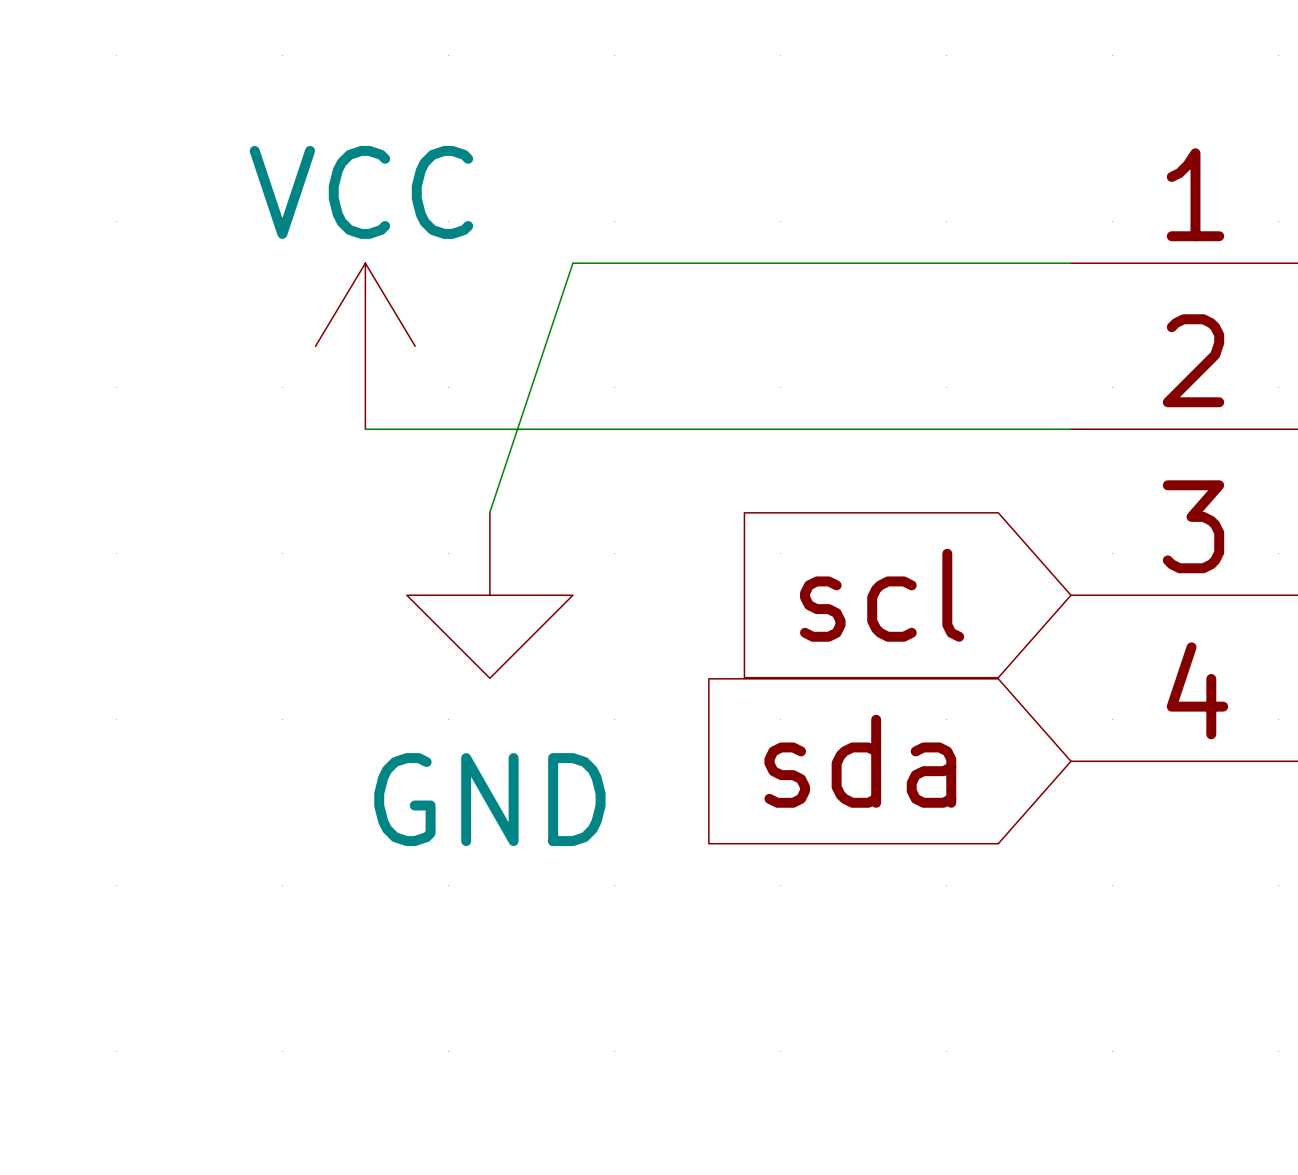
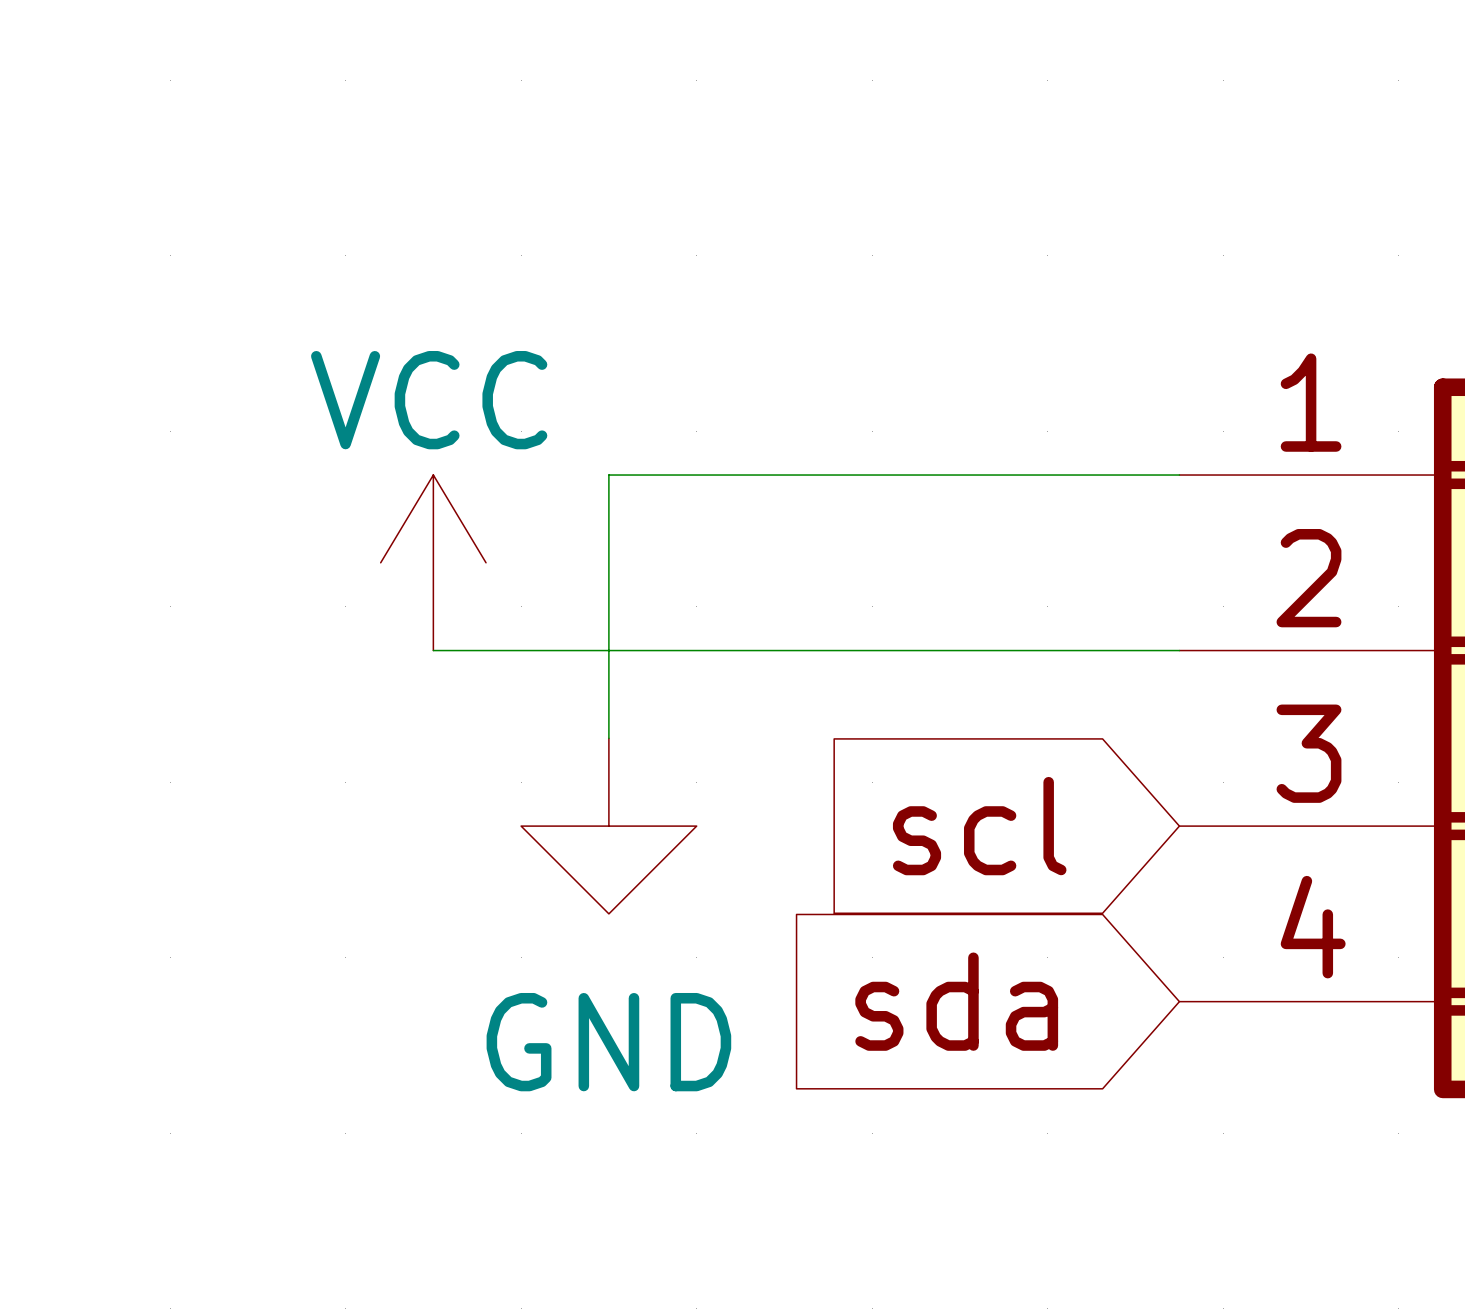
wire: (572, 263) (489, 512) -> (652, 475) (608, 475) (608, 738)
power symbol position: GND (489, 595) -> GND (608, 826)

